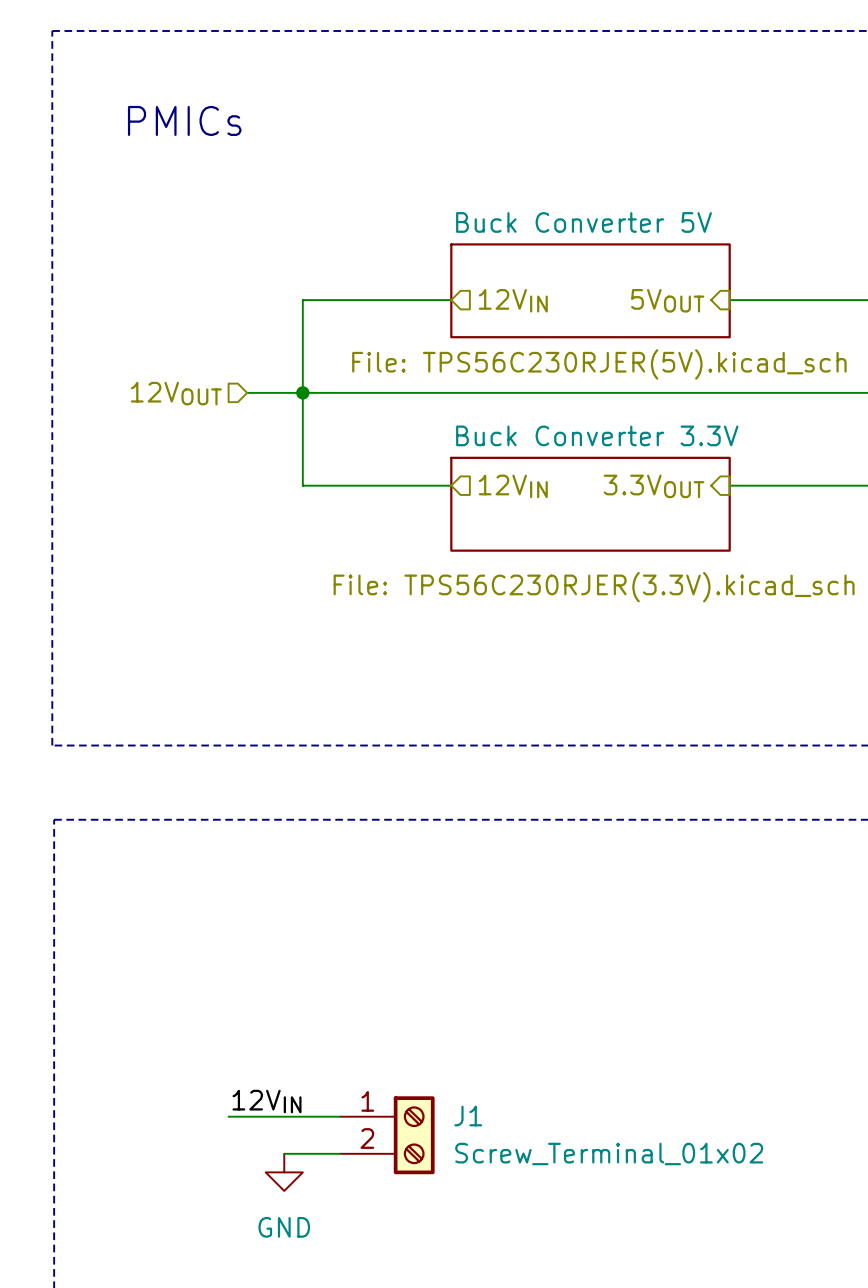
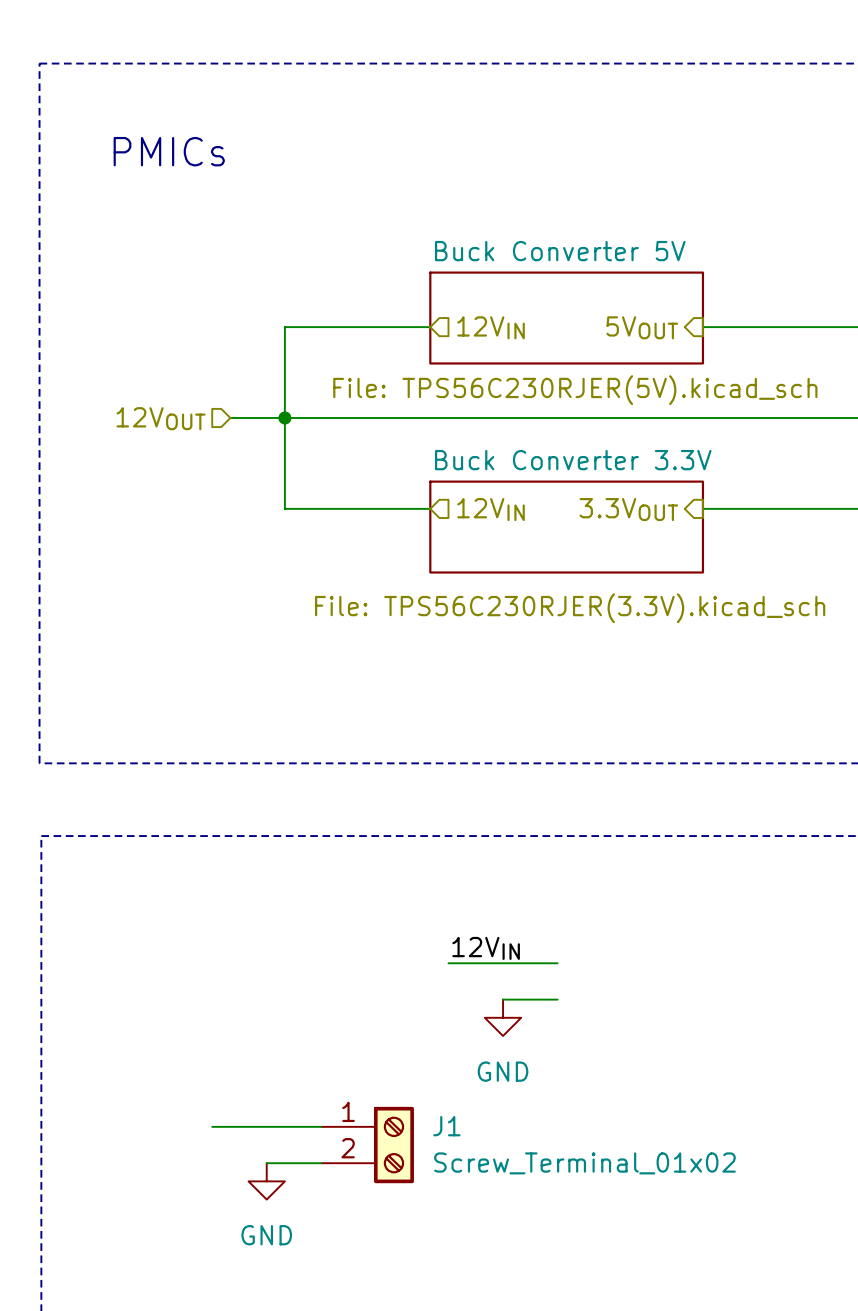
wire: none -> (448, 963) (557, 963)
wire: none -> (503, 999) (557, 999)
power symbol: none -> GND (503, 1017)
label position: 12VIN (267, 1101) -> 12VIN (486, 948)

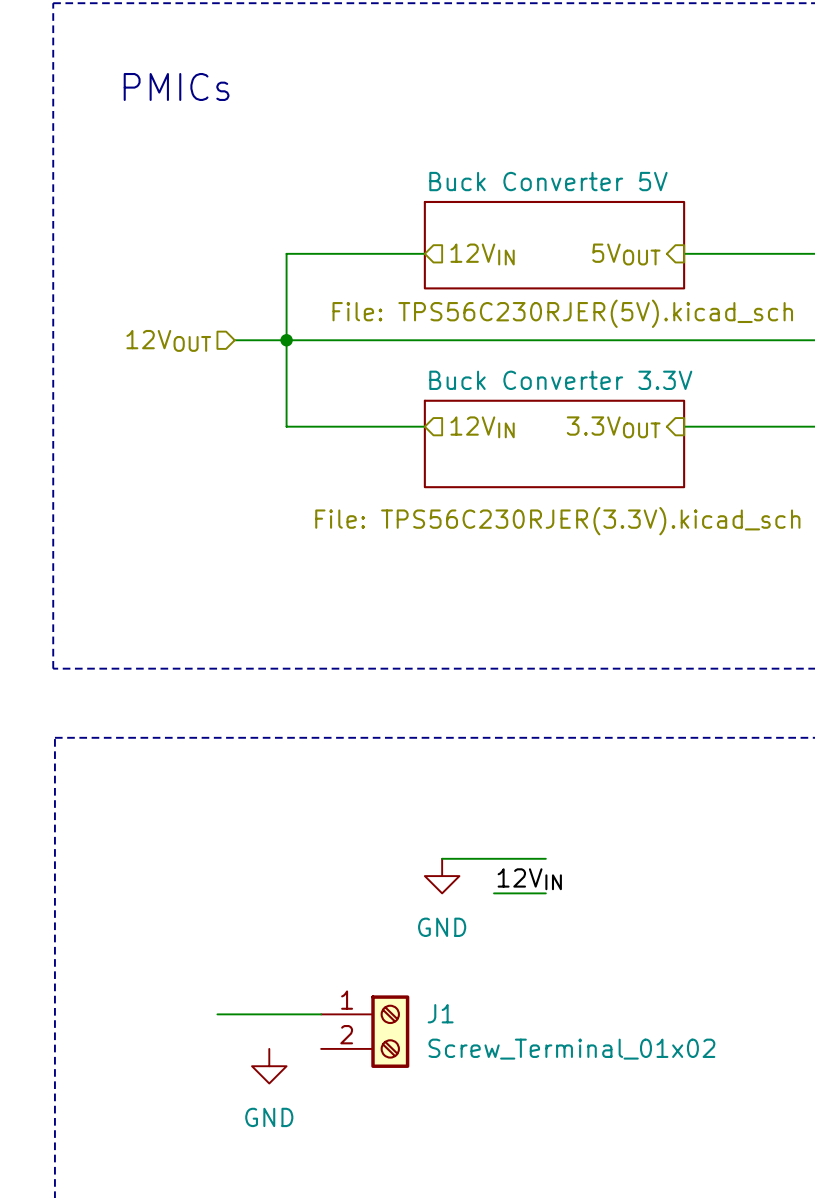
label position: 12VIN (486, 948) -> 12VIN (529, 879)
power symbol position: GND (503, 1017) -> GND (442, 876)
wire: (266, 1163) (321, 1163) -> none

